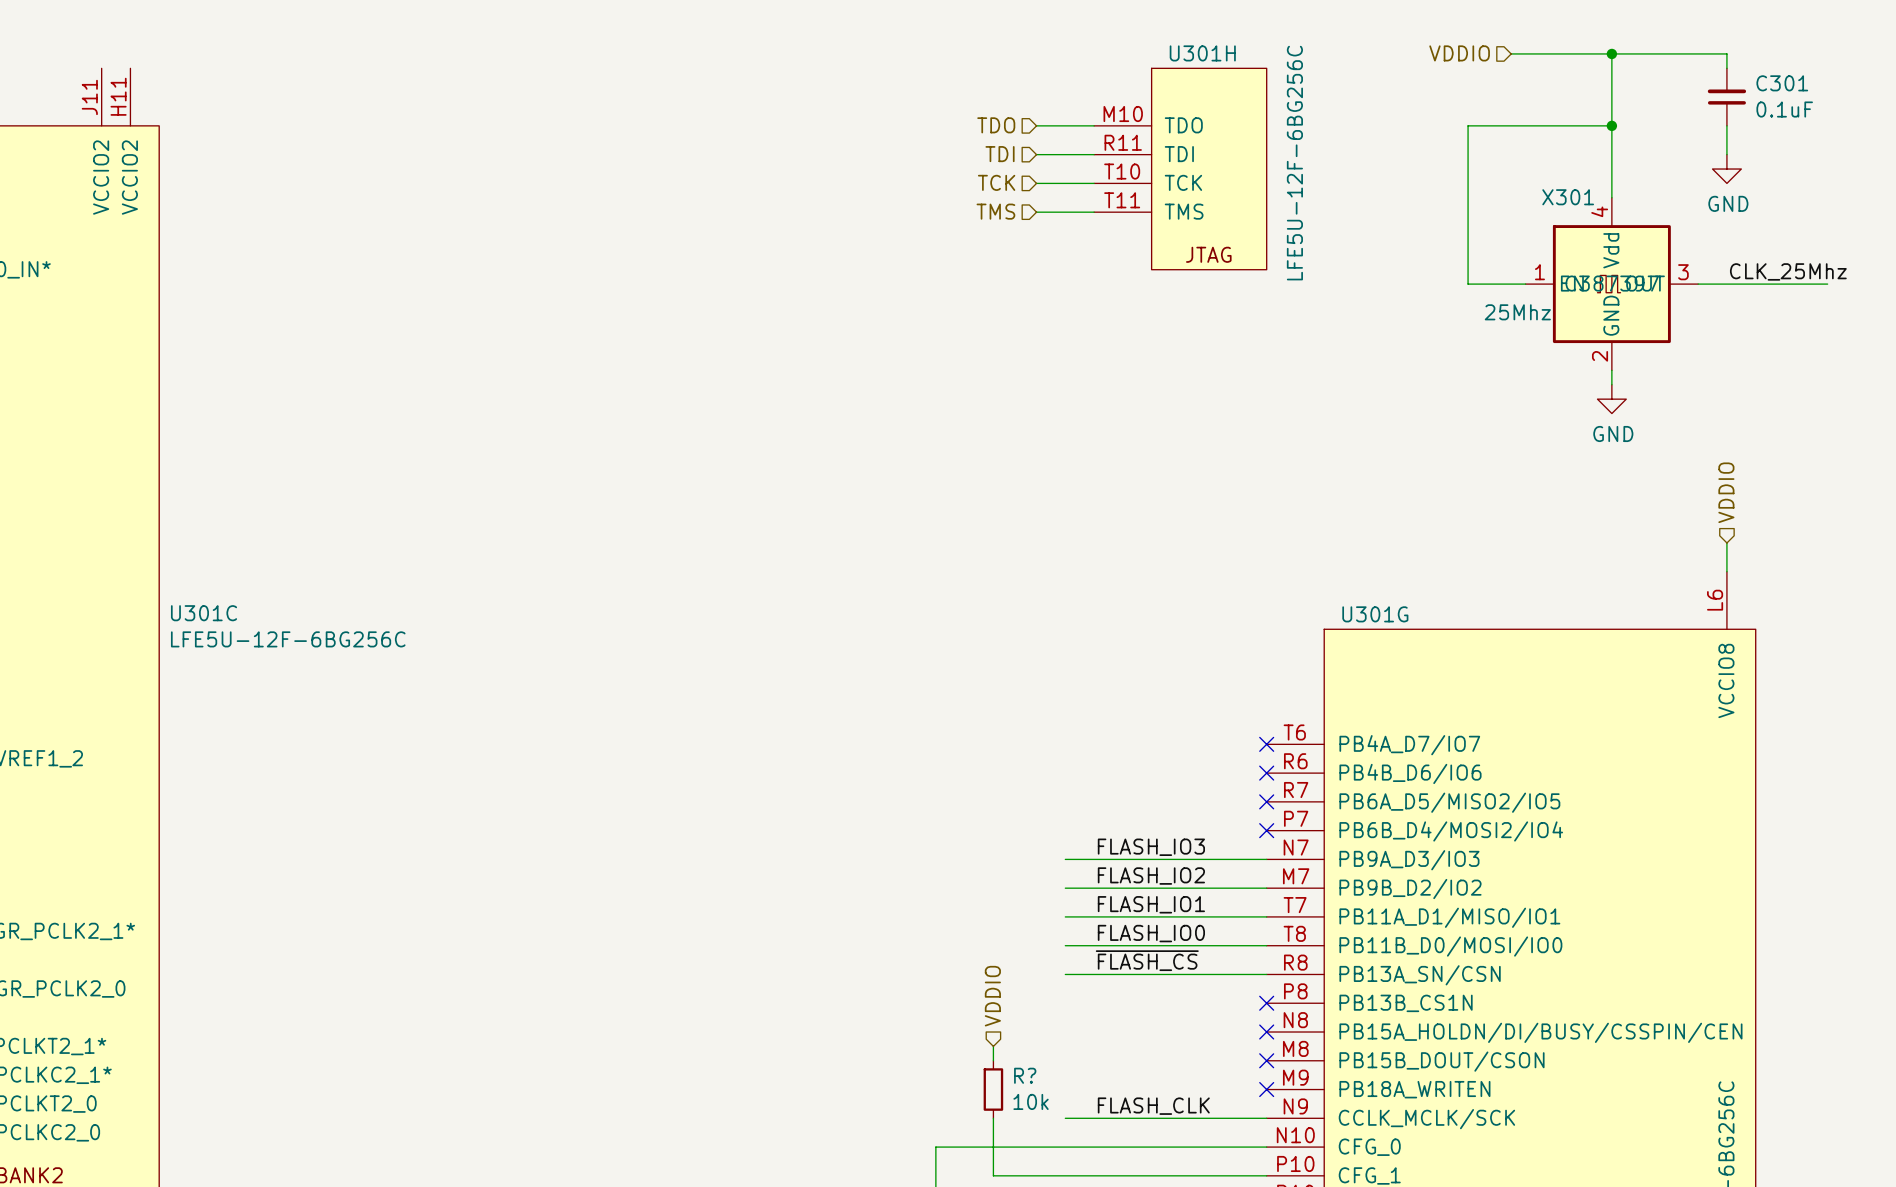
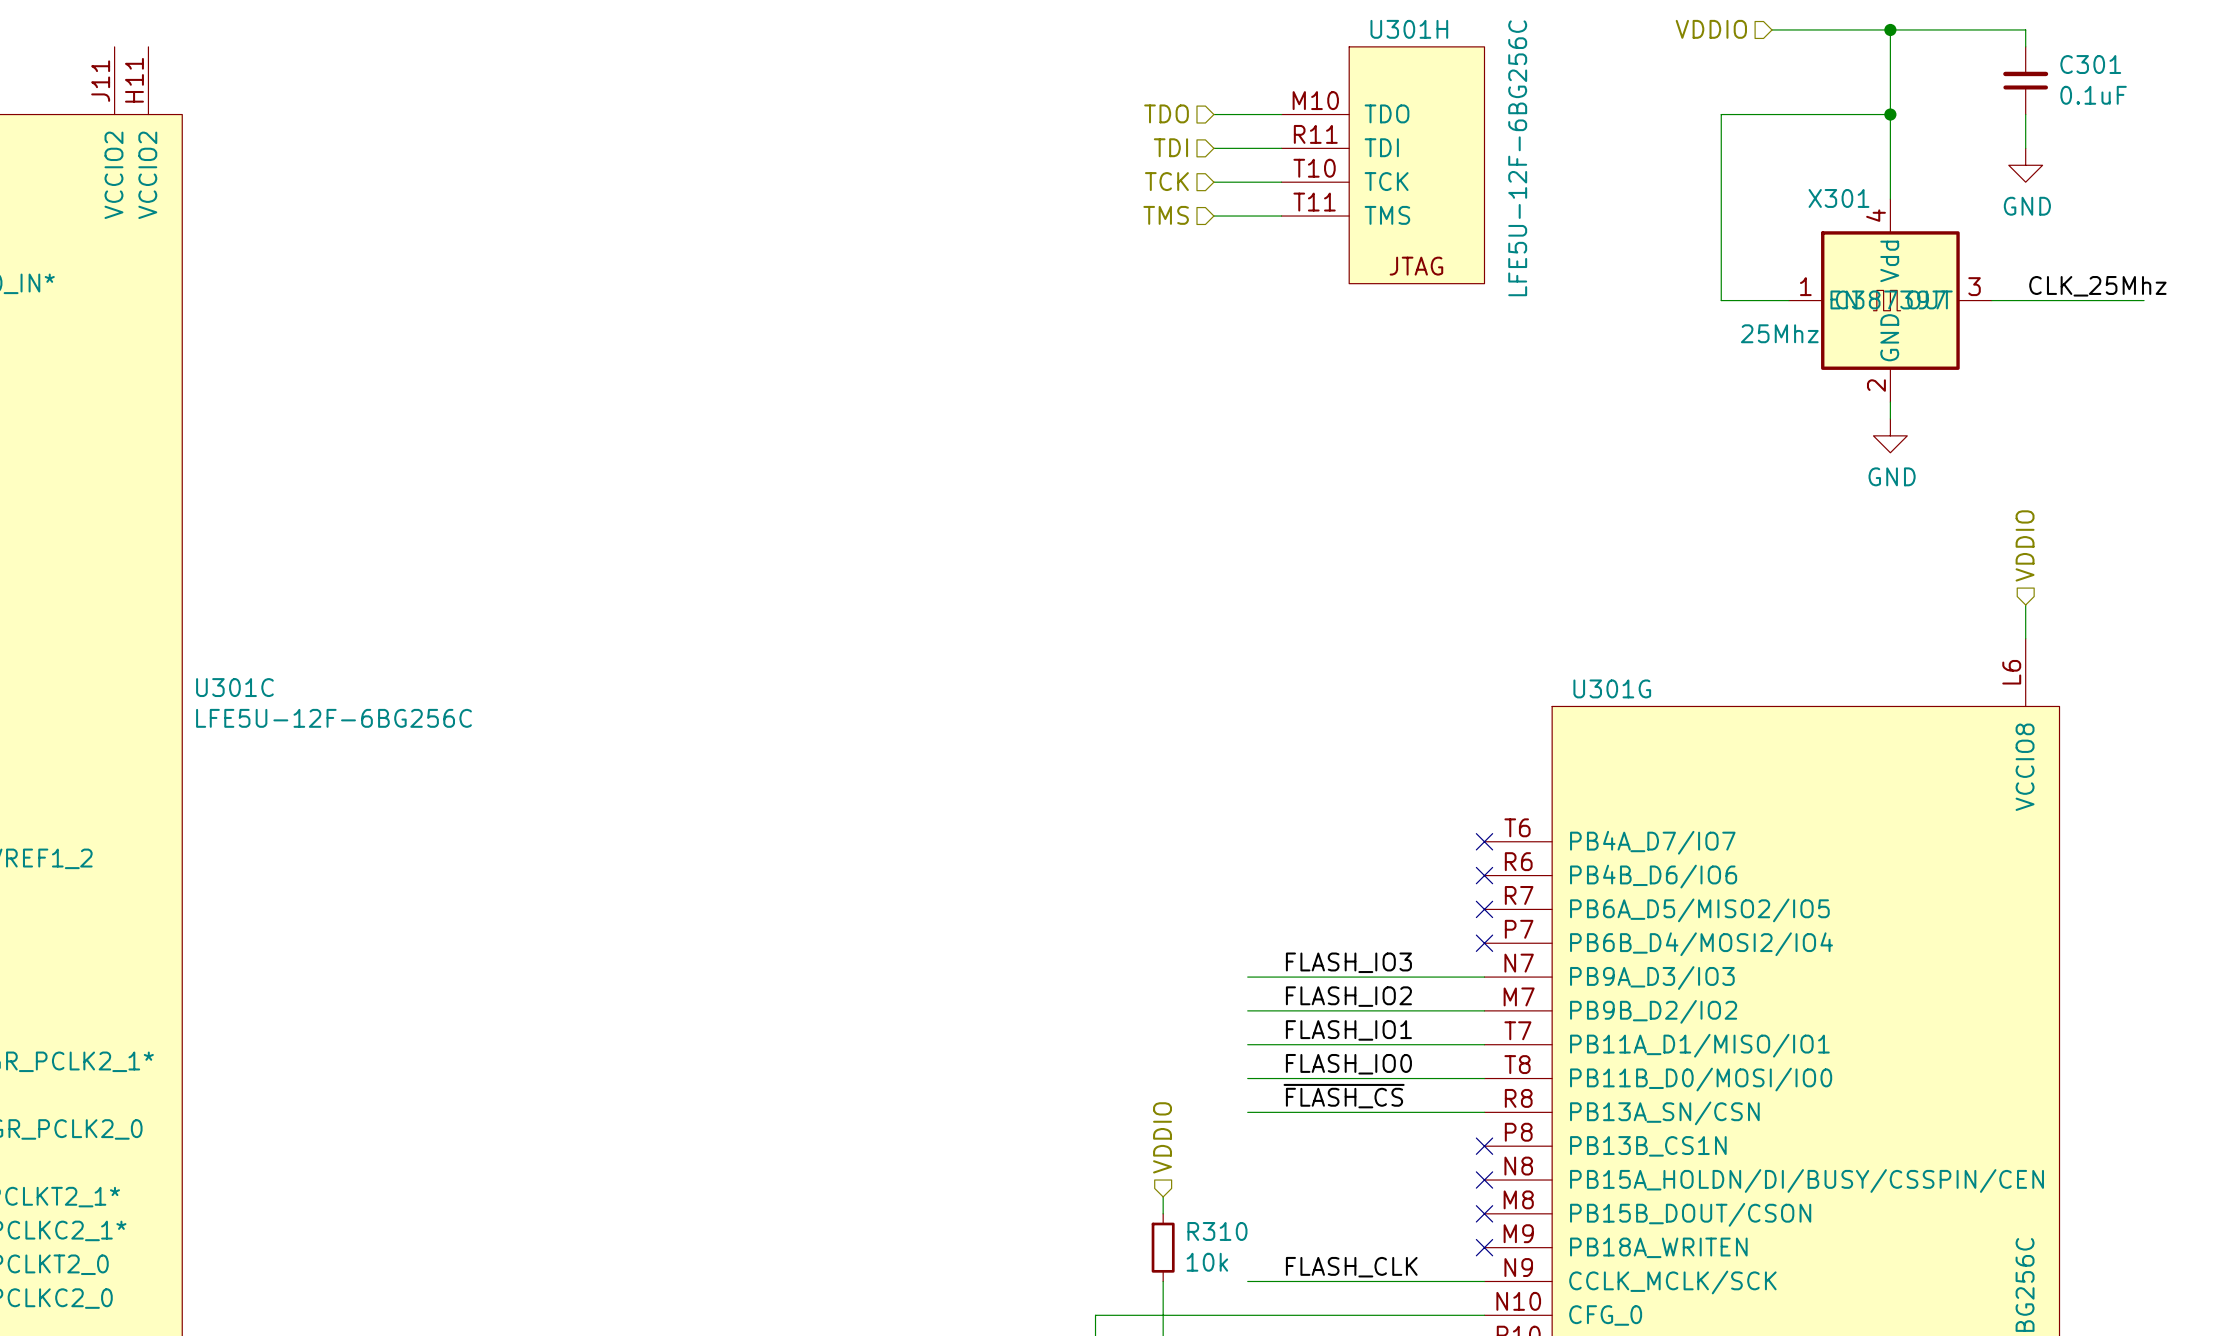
R? name: R? (1025, 1075) -> R310 (1217, 1231)

